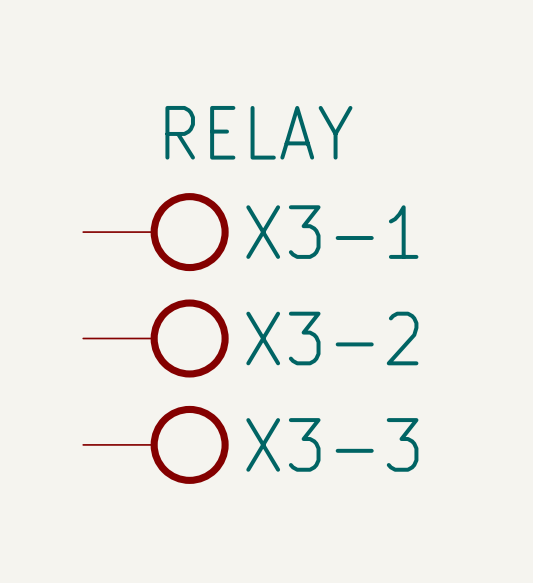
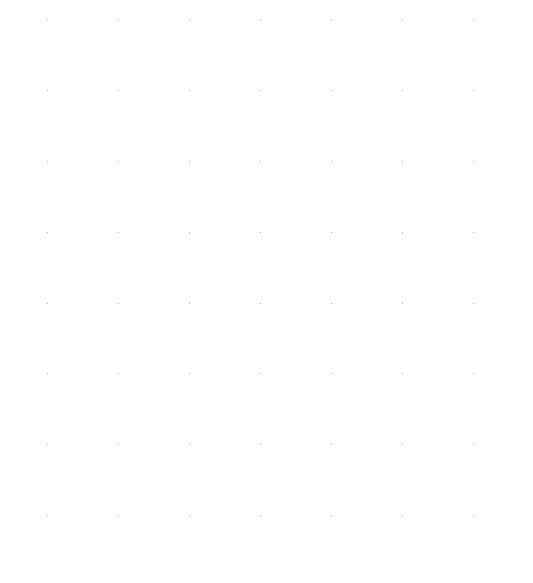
X3-1: RELAY (155, 232) -> none
X3-2: (155, 338) -> none
X3-3: (155, 444) -> none

